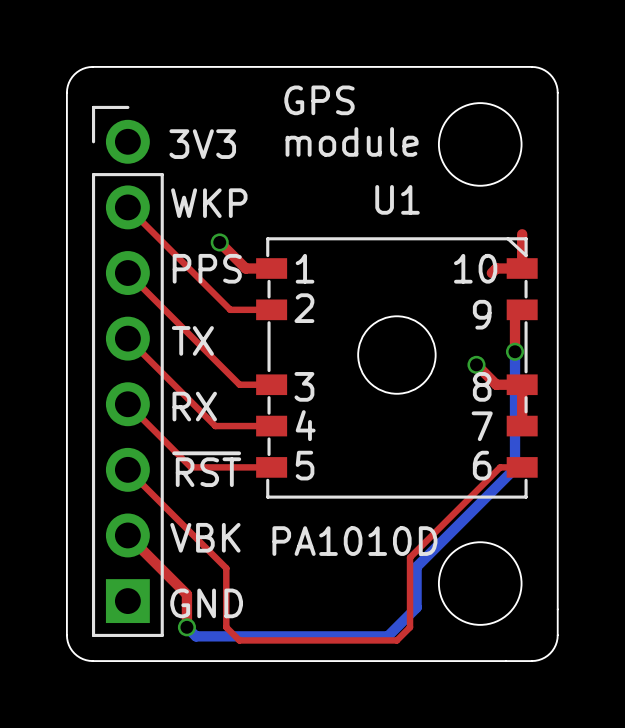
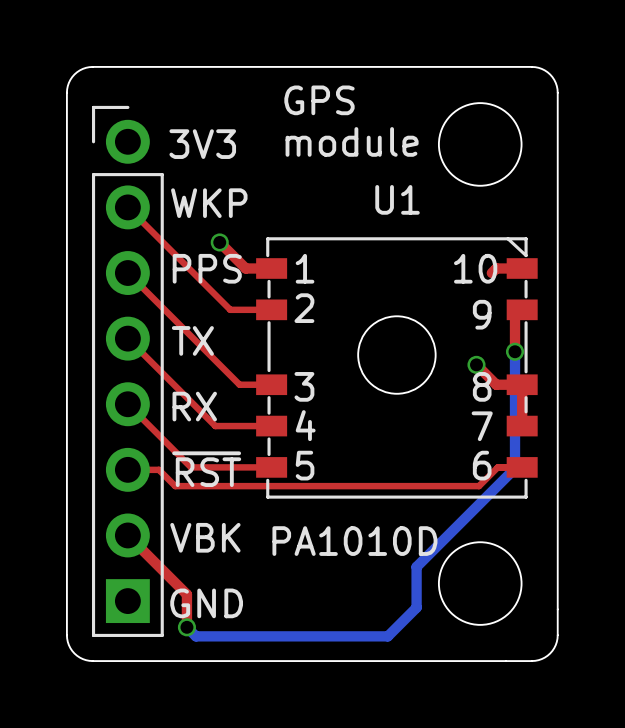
top track: (522, 234) (522, 268) -> none
top track: (500, 467) (410, 557) (410, 627) (396, 640) (239, 640) (226, 627) (226, 568) (127, 469) -> (500, 467) (497, 467) (479, 486) (175, 486) (158, 469) (127, 469)

